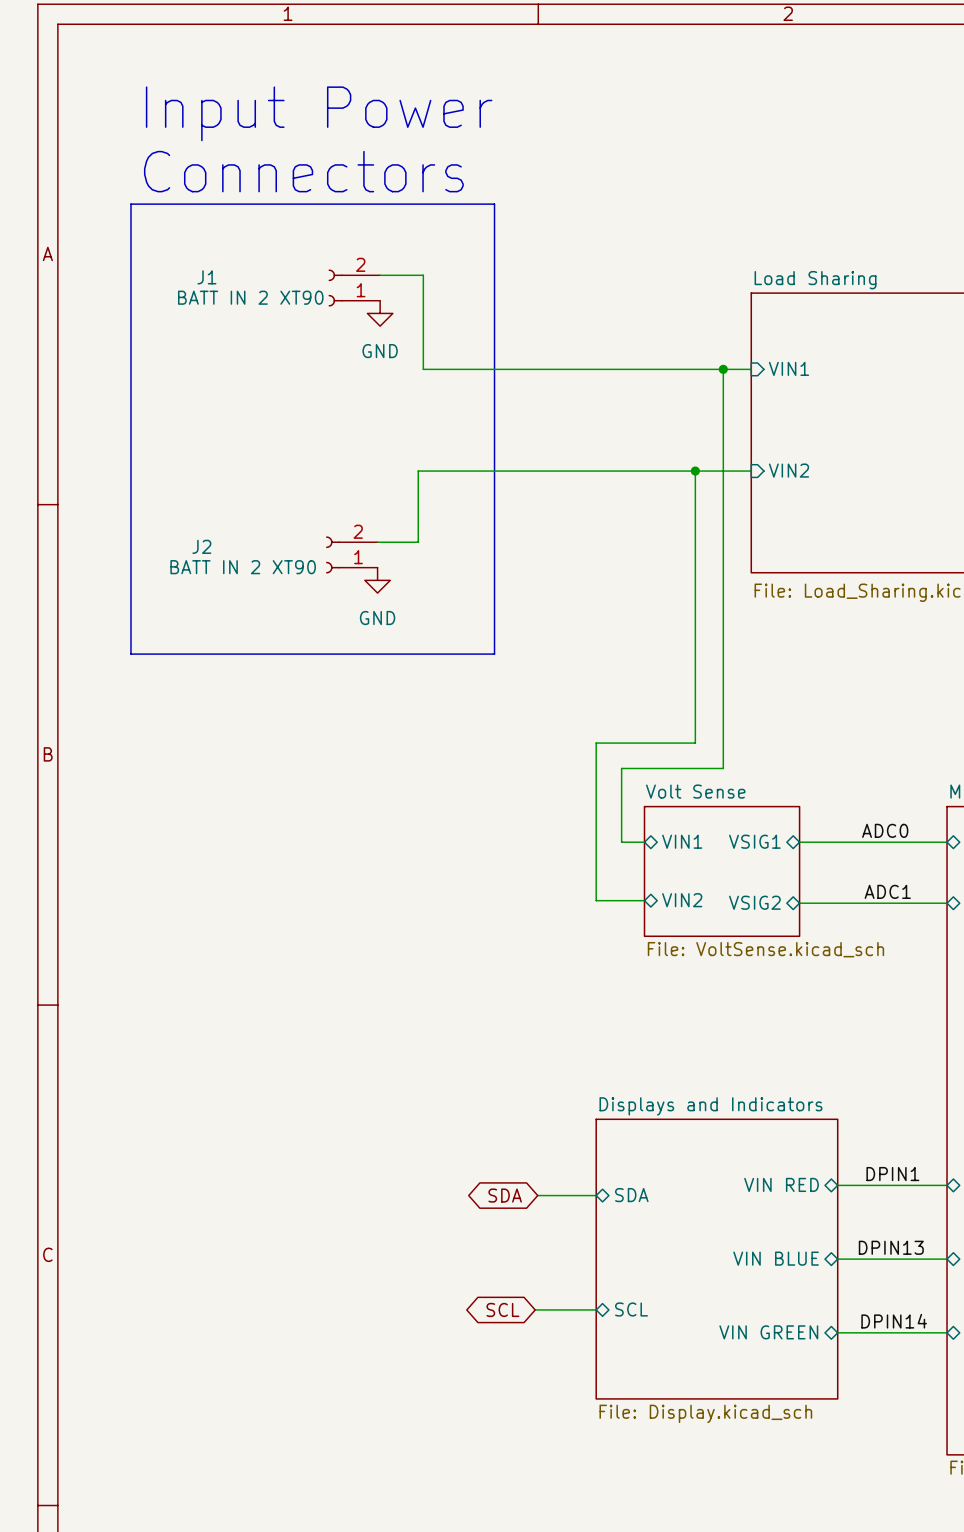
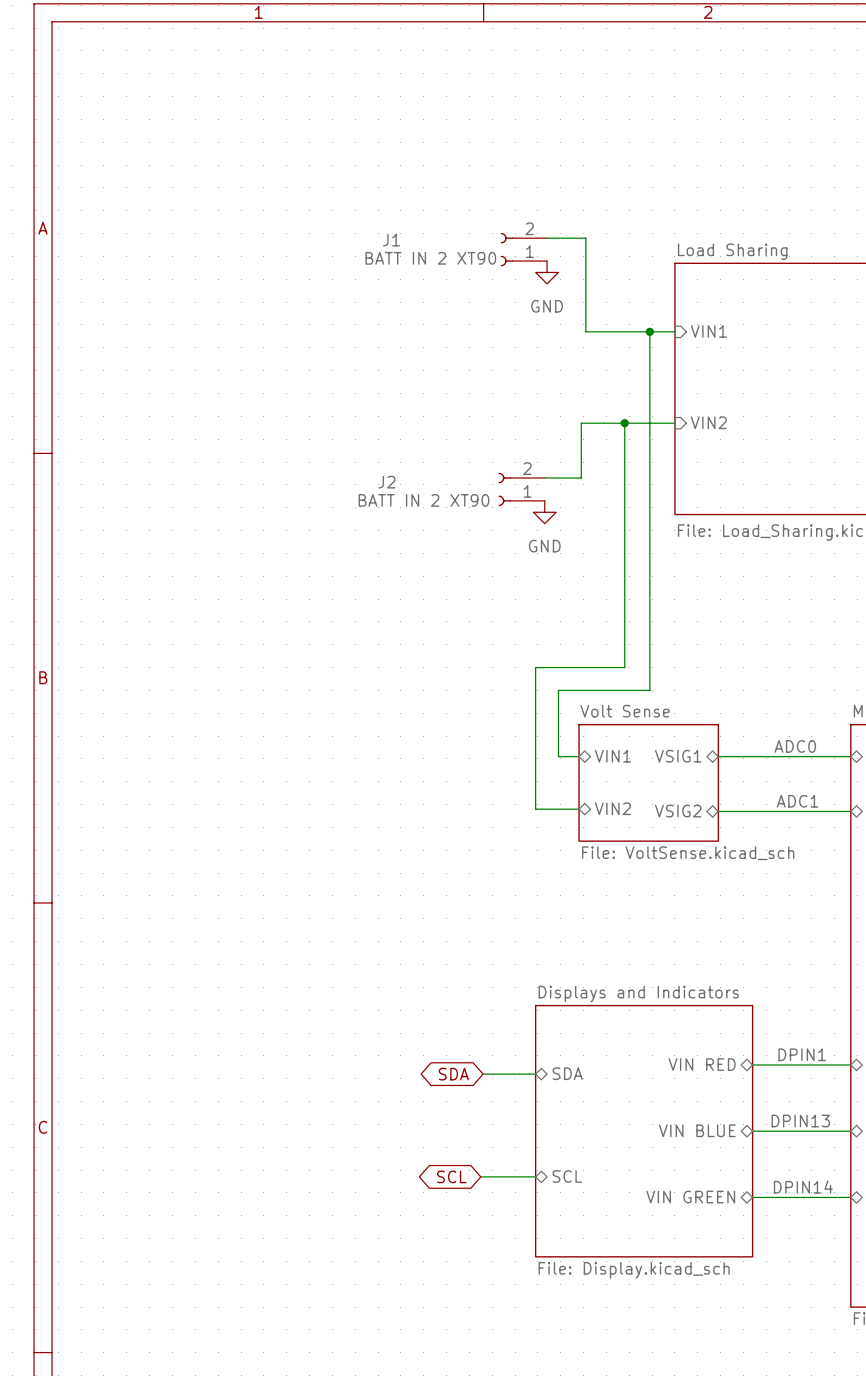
text: Input Power (319, 113) -> none
text: Connectors (303, 171) -> none
line: (130, 204) (494, 204) (494, 654) (130, 654) (130, 204) -> none
wire: (380, 275) (423, 275) (423, 369) (652, 369) -> (547, 238) (585, 238) (585, 331)
J1 position: (354, 288) -> (523, 249)
power symbol: none -> GND (547, 272)
power symbol: GND (380, 313) -> none
wire: (647, 471) (418, 471) (418, 542) (377, 542) -> (581, 423) (581, 478) (544, 478)
J2 position: (351, 554) -> (521, 489)
power symbol: none -> GND (544, 512)
power symbol: GND (377, 580) -> none

